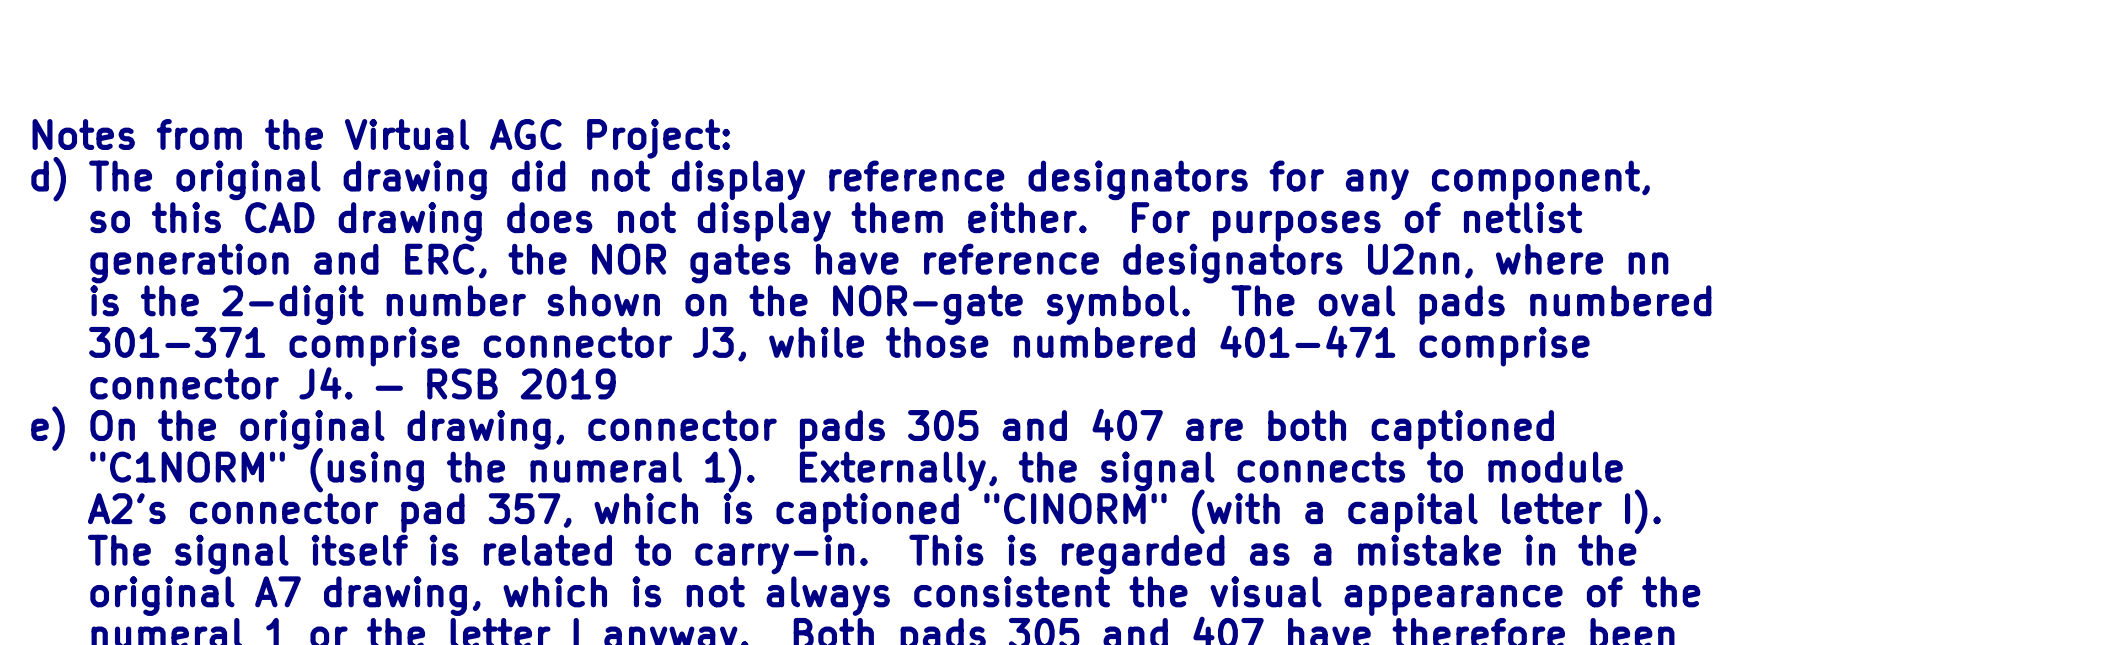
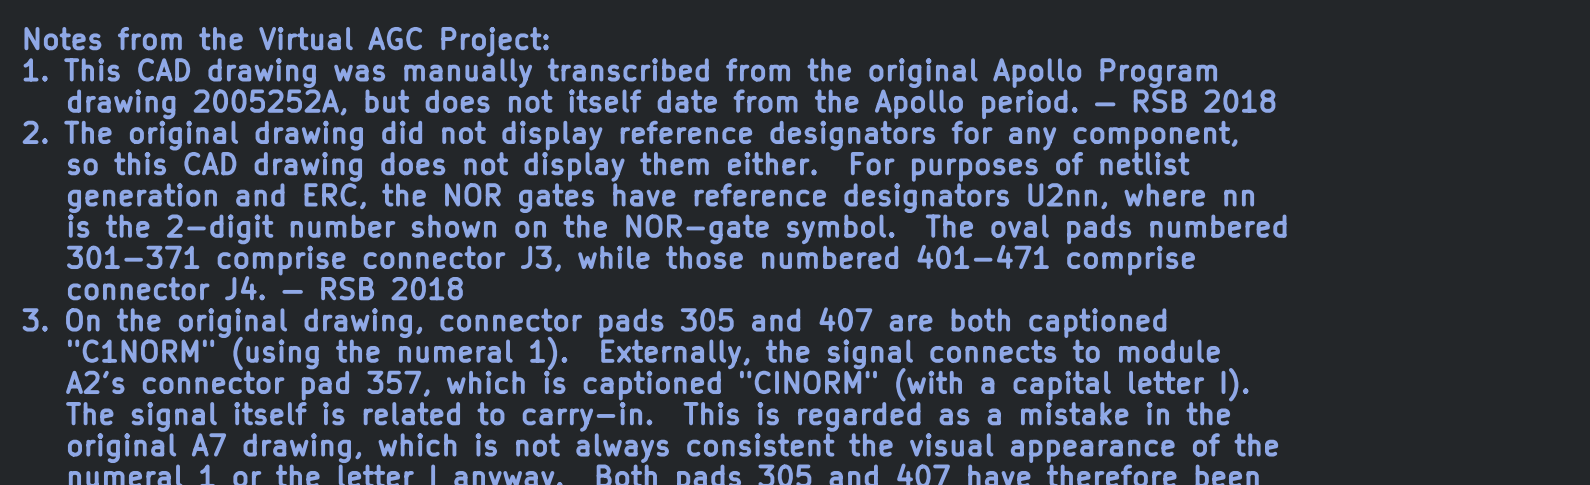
text: none -> Notes from the Virtual AGC Project: (286, 41)
text: none -> 1. This CAD drawing was manually transcribed from the original Apollo Program (620, 73)
text: Notes from the Virtual AGC Project: (381, 138) -> drawing 2005252A, but does not itself date from the Apollo period. — RSB 2018 (671, 104)
text: d) The original drawing did not display reference designators for any component, (840, 179) -> 2. The original drawing did not display reference designators for any component, (630, 135)
text: connector J4. — RSB 2019 (353, 383) -> connector J4. — RSB 2018 (265, 288)
text: e) On the original drawing, connector pads 305 and 407 are both captioned (792, 428) -> 3. On the original drawing, connector pads 305 and 407 are both captioned (594, 322)

